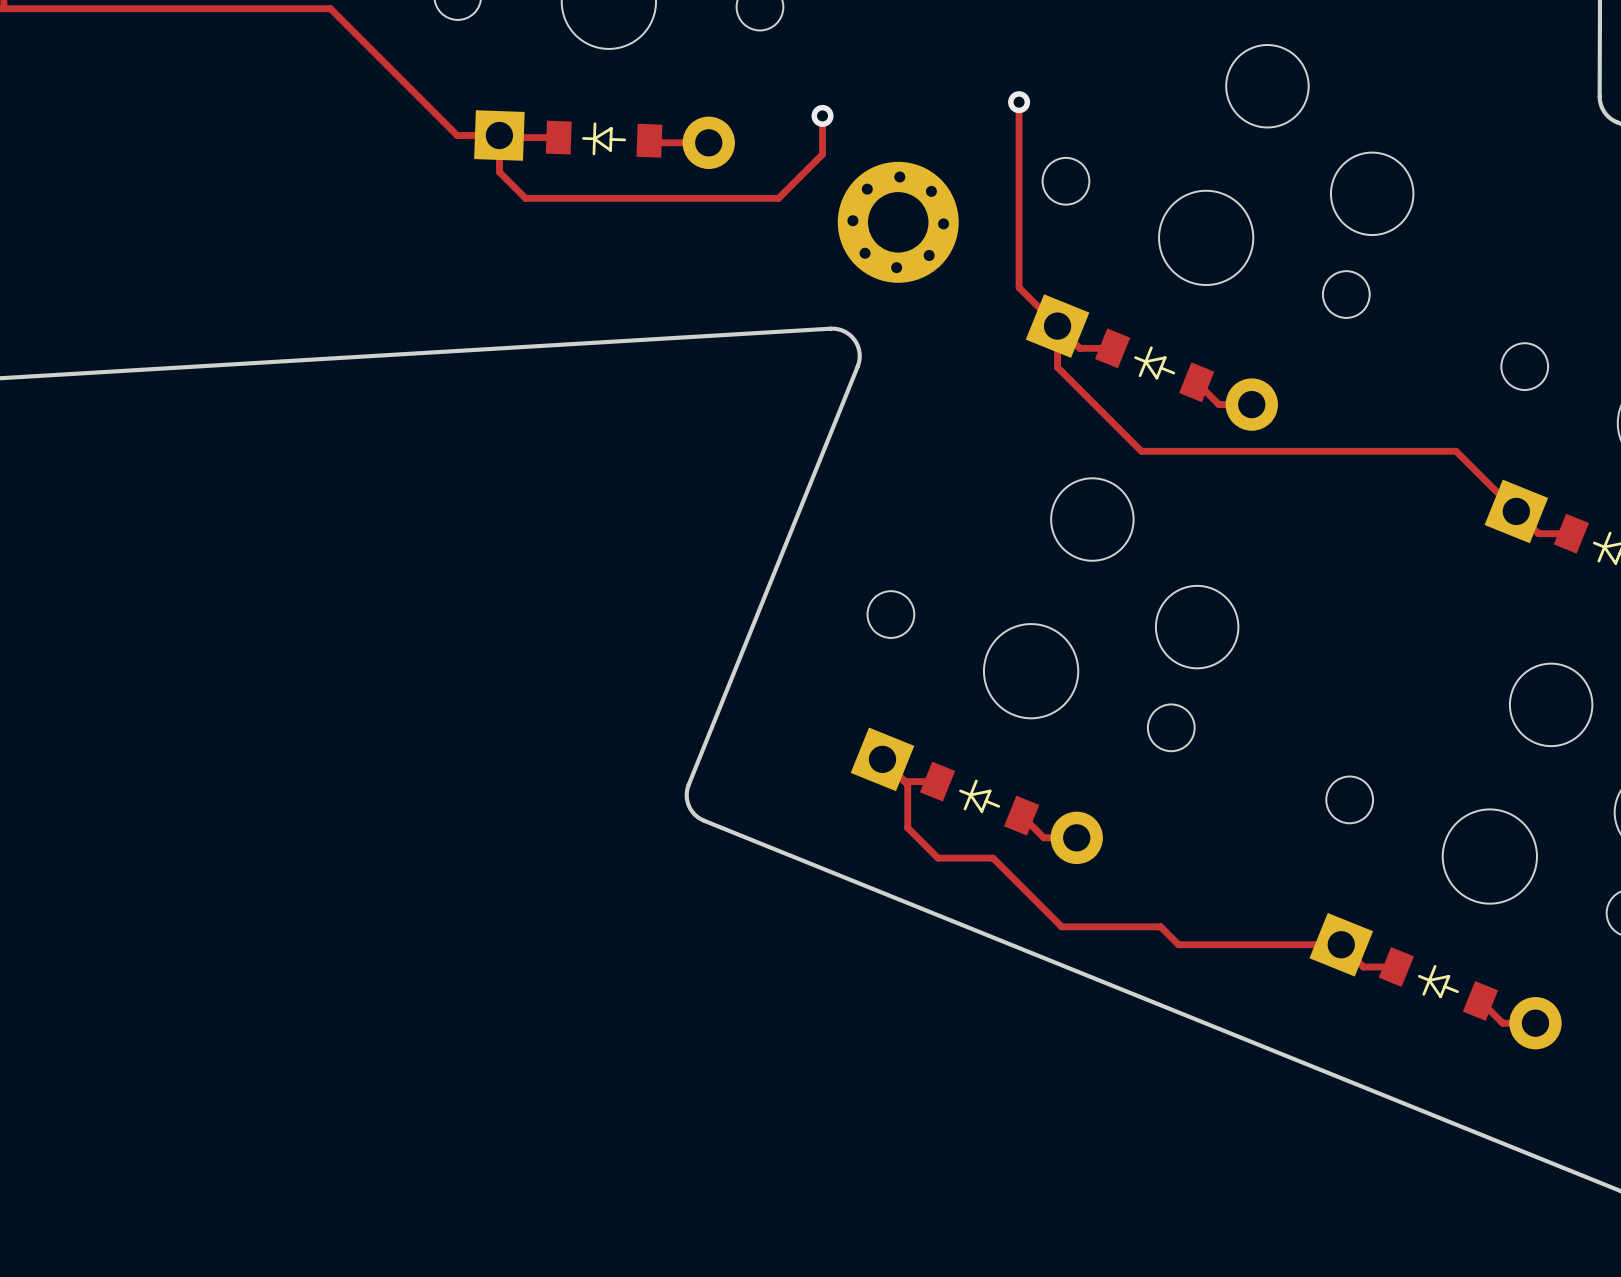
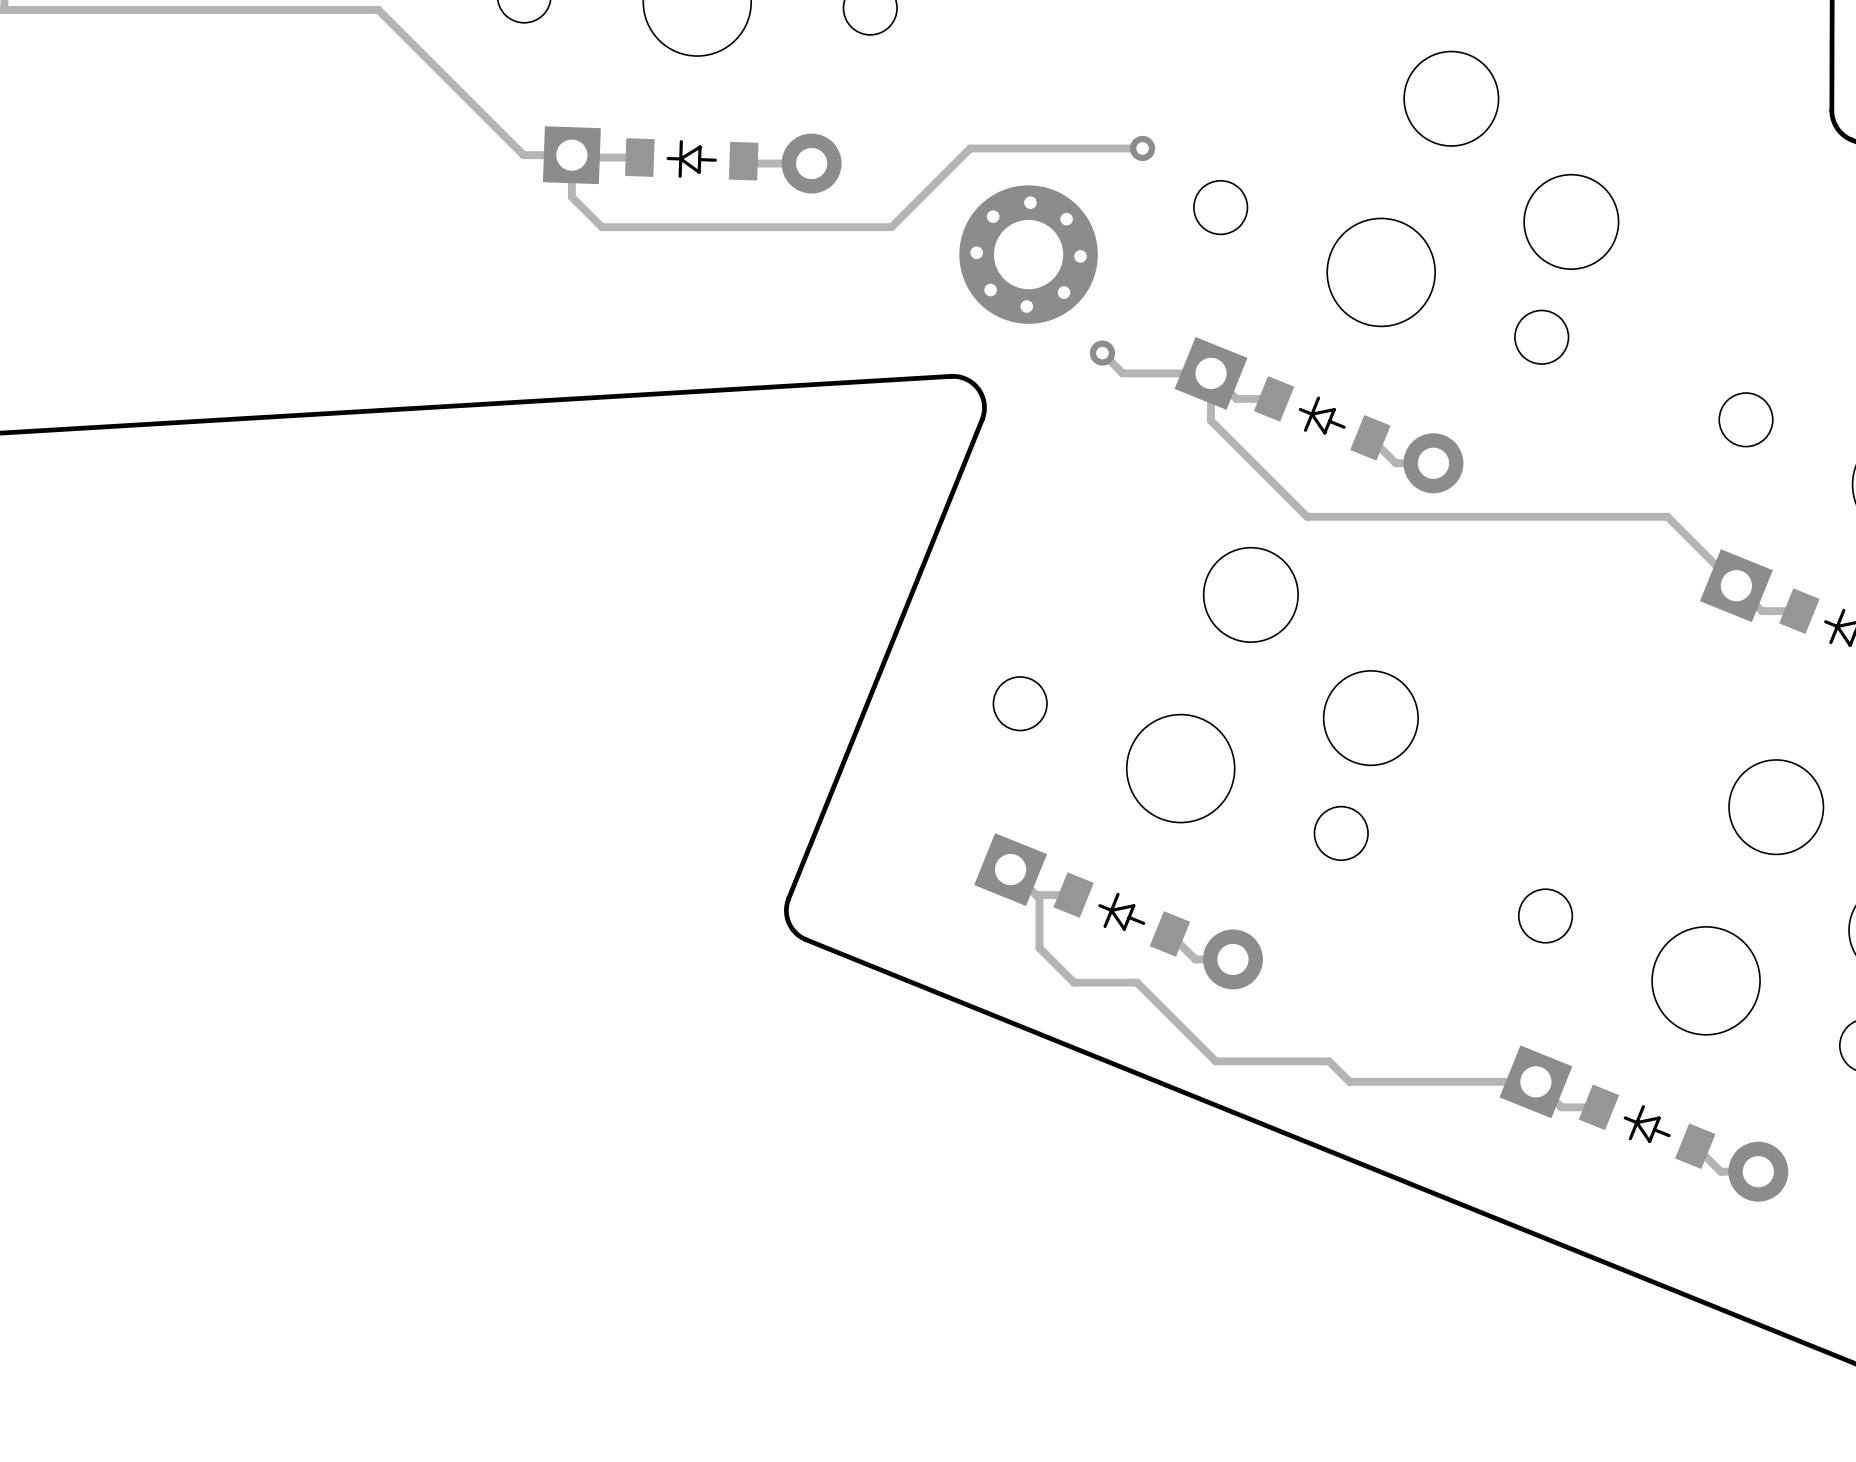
track: (1019, 102) (1019, 287) (1057, 326) -> (1102, 353) (1122, 373) (1211, 373)
via position: (1019, 102) -> (1142, 148)
track: (822, 115) (822, 154) -> (1142, 148) (970, 148) (941, 176)
via: (822, 115) -> none
via: none -> (1102, 353)

